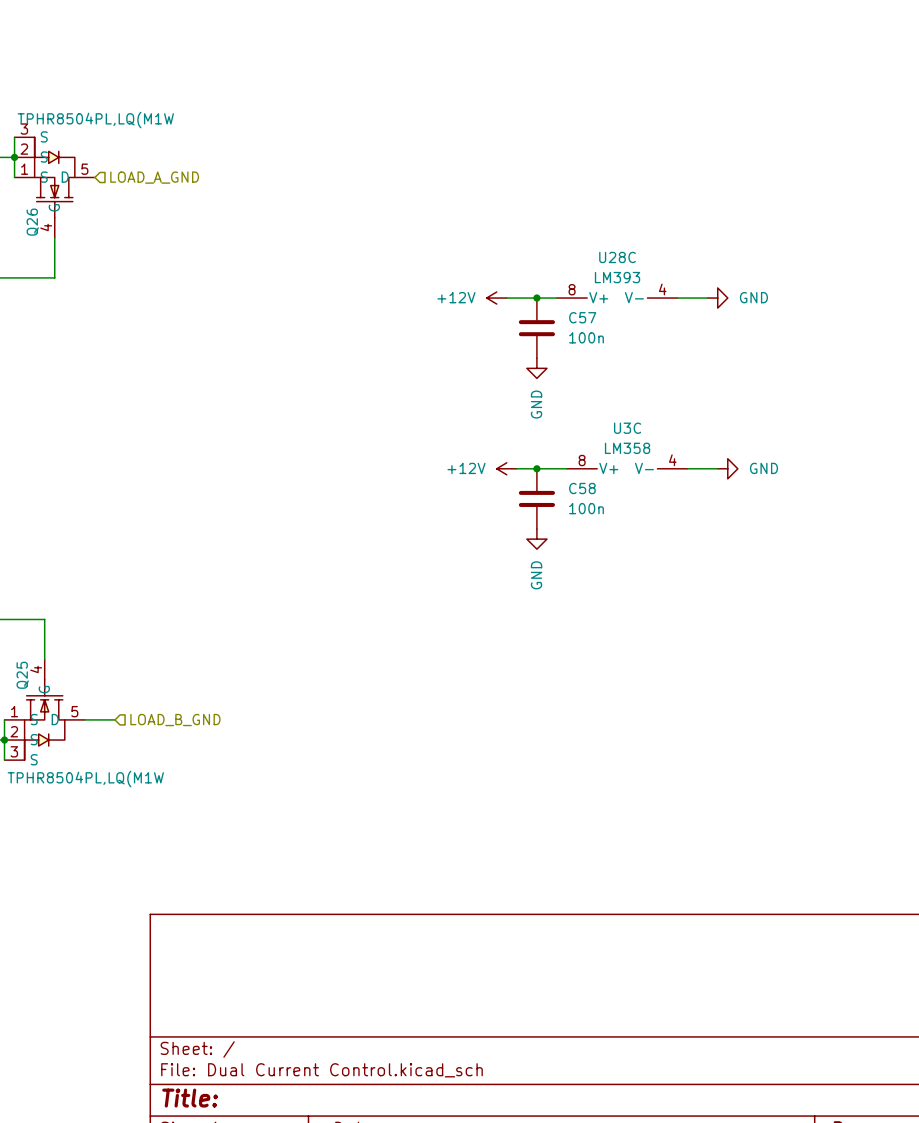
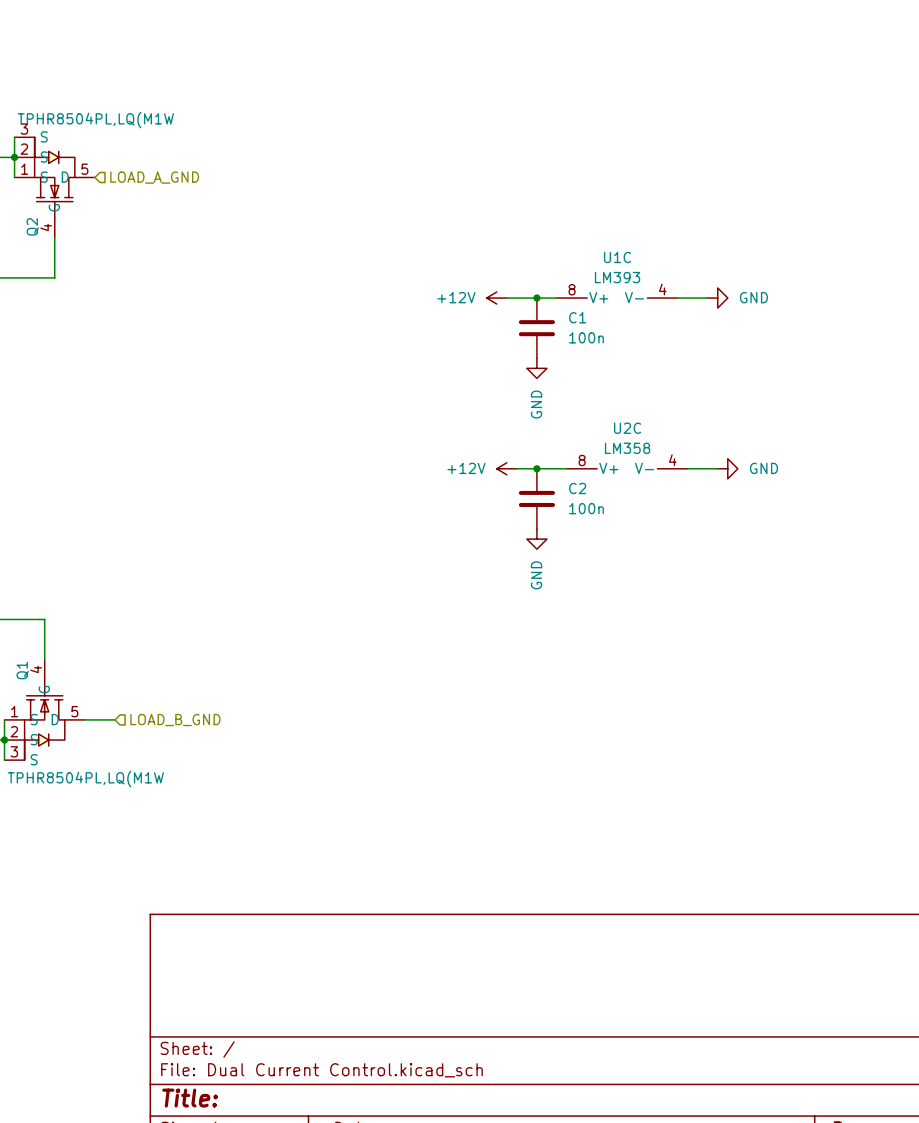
Q26 name: Q26 (32, 222) -> Q2 (32, 226)
U28C name: U28C (617, 257) -> U1C (617, 257)
C57 name: C57 (582, 317) -> C1 (577, 317)
U3C name: U3C (627, 428) -> U2C (627, 428)
C58 name: C58 (582, 488) -> C2 (577, 488)
Q25 name: Q25 (22, 675) -> Q1 (22, 670)

